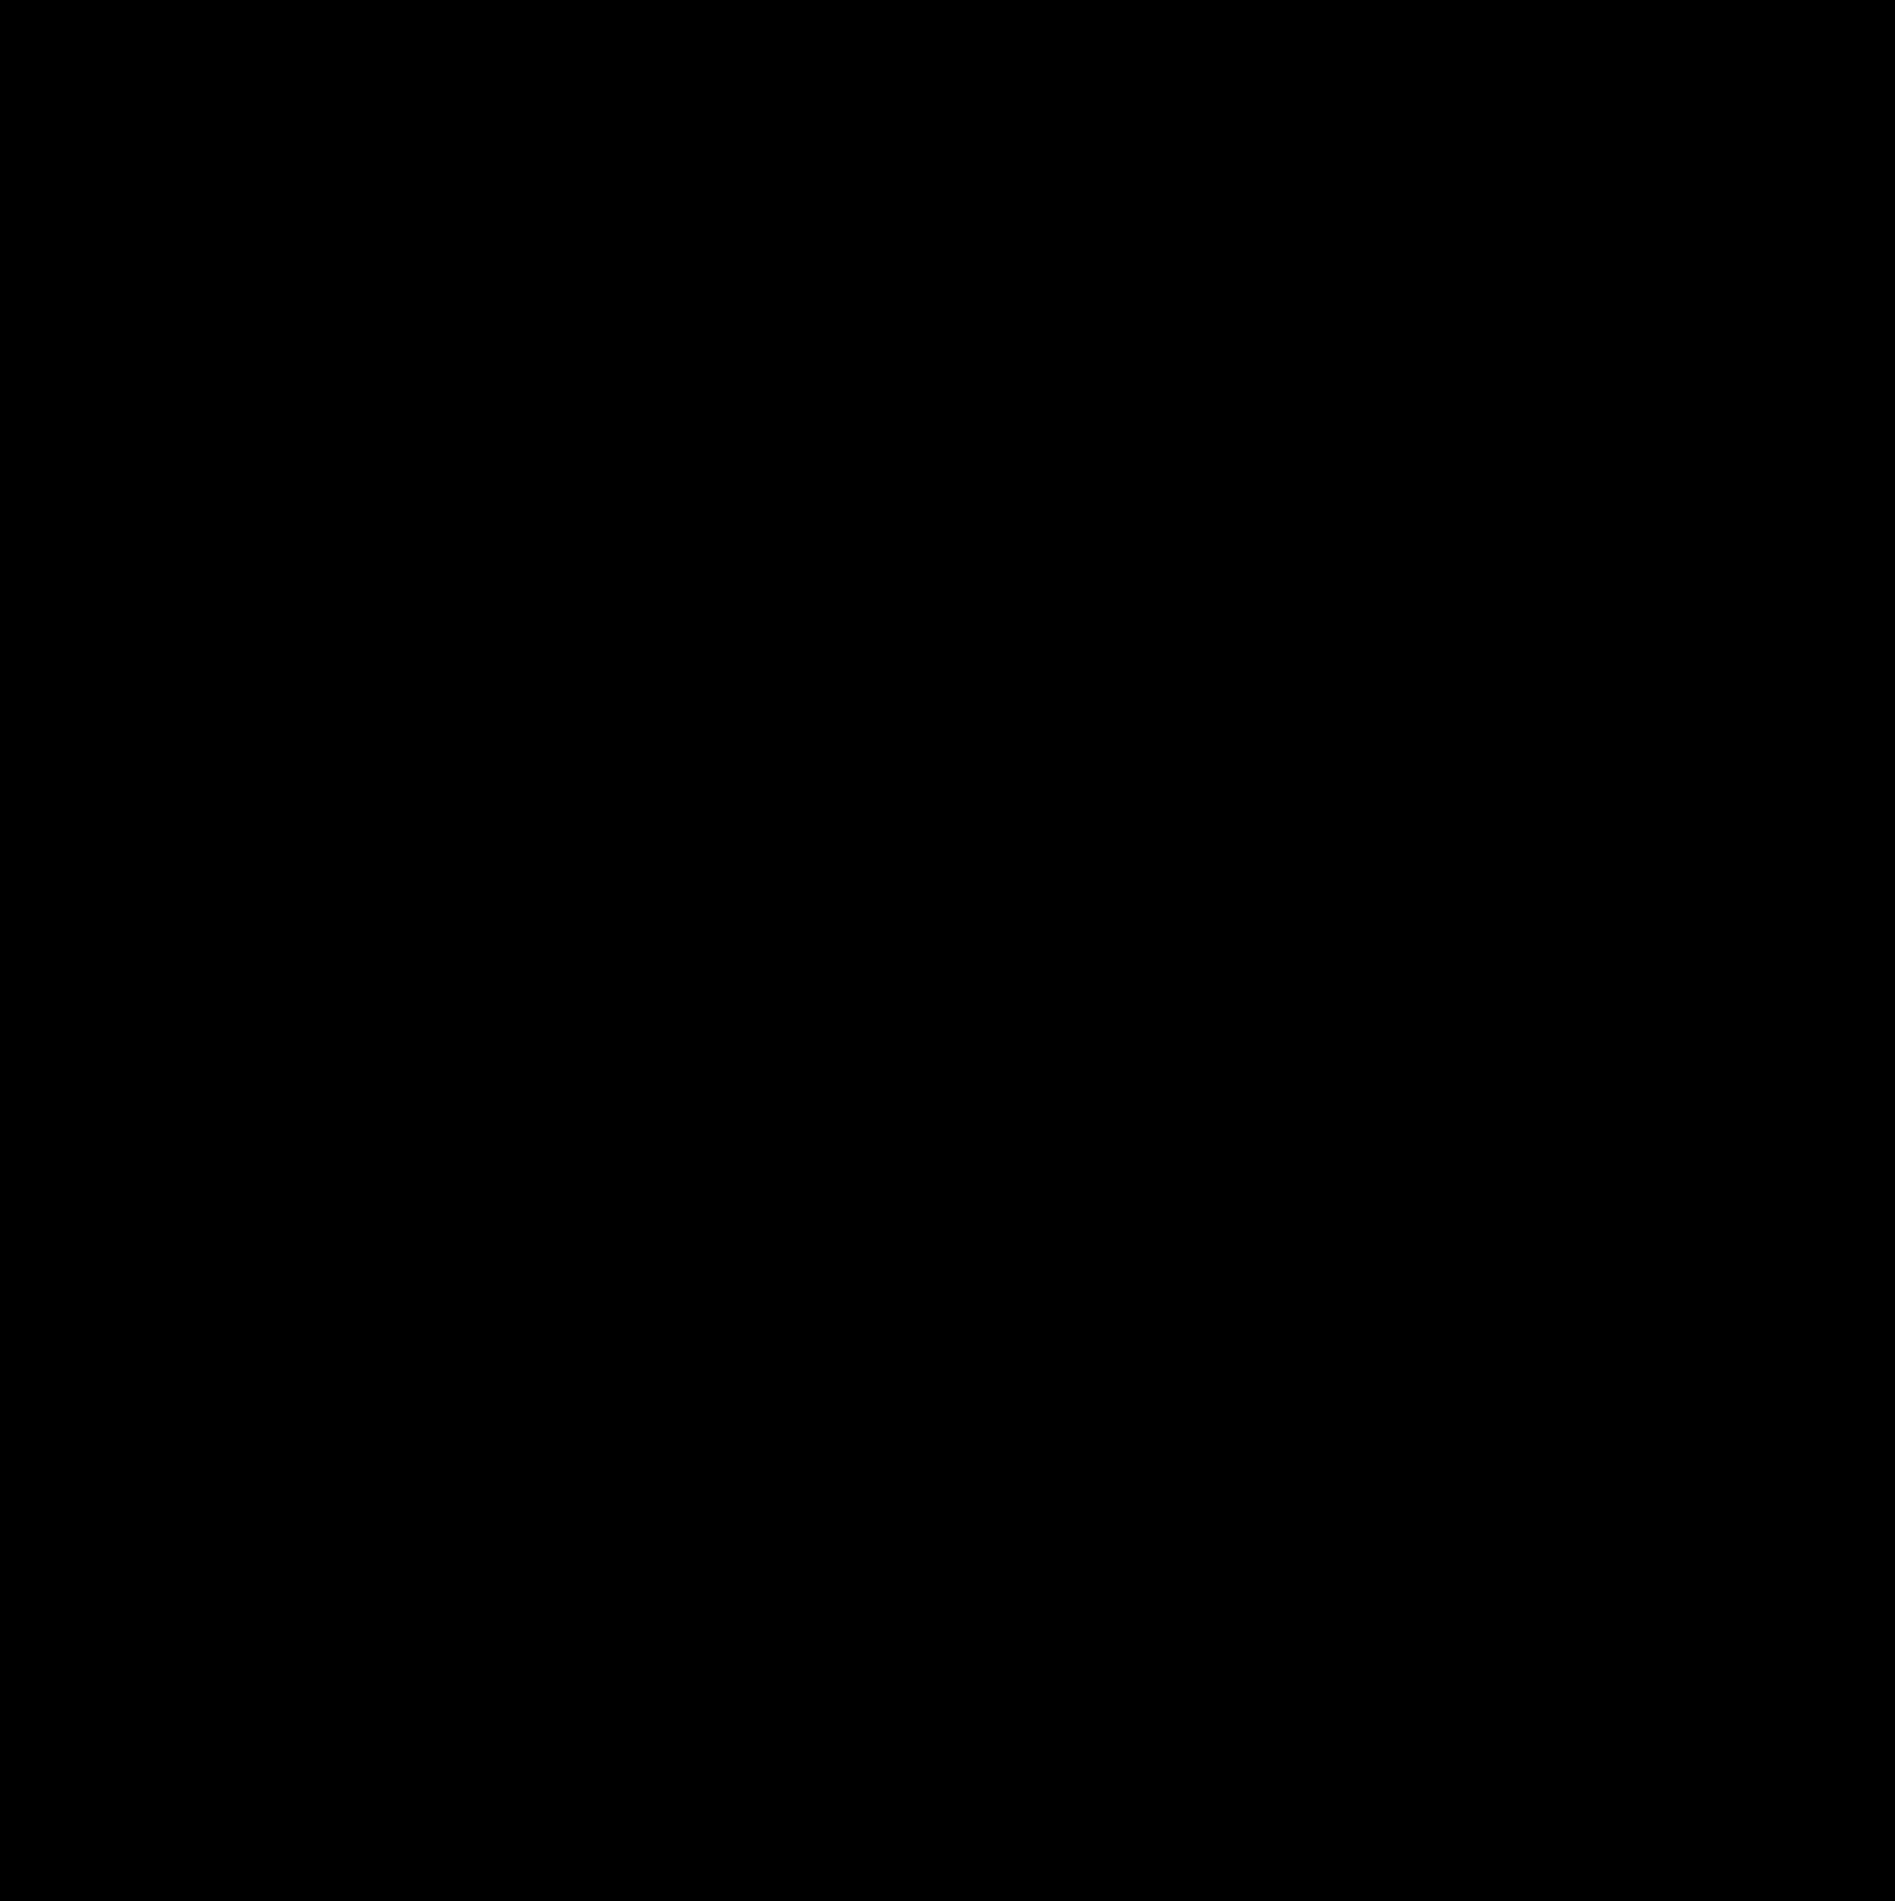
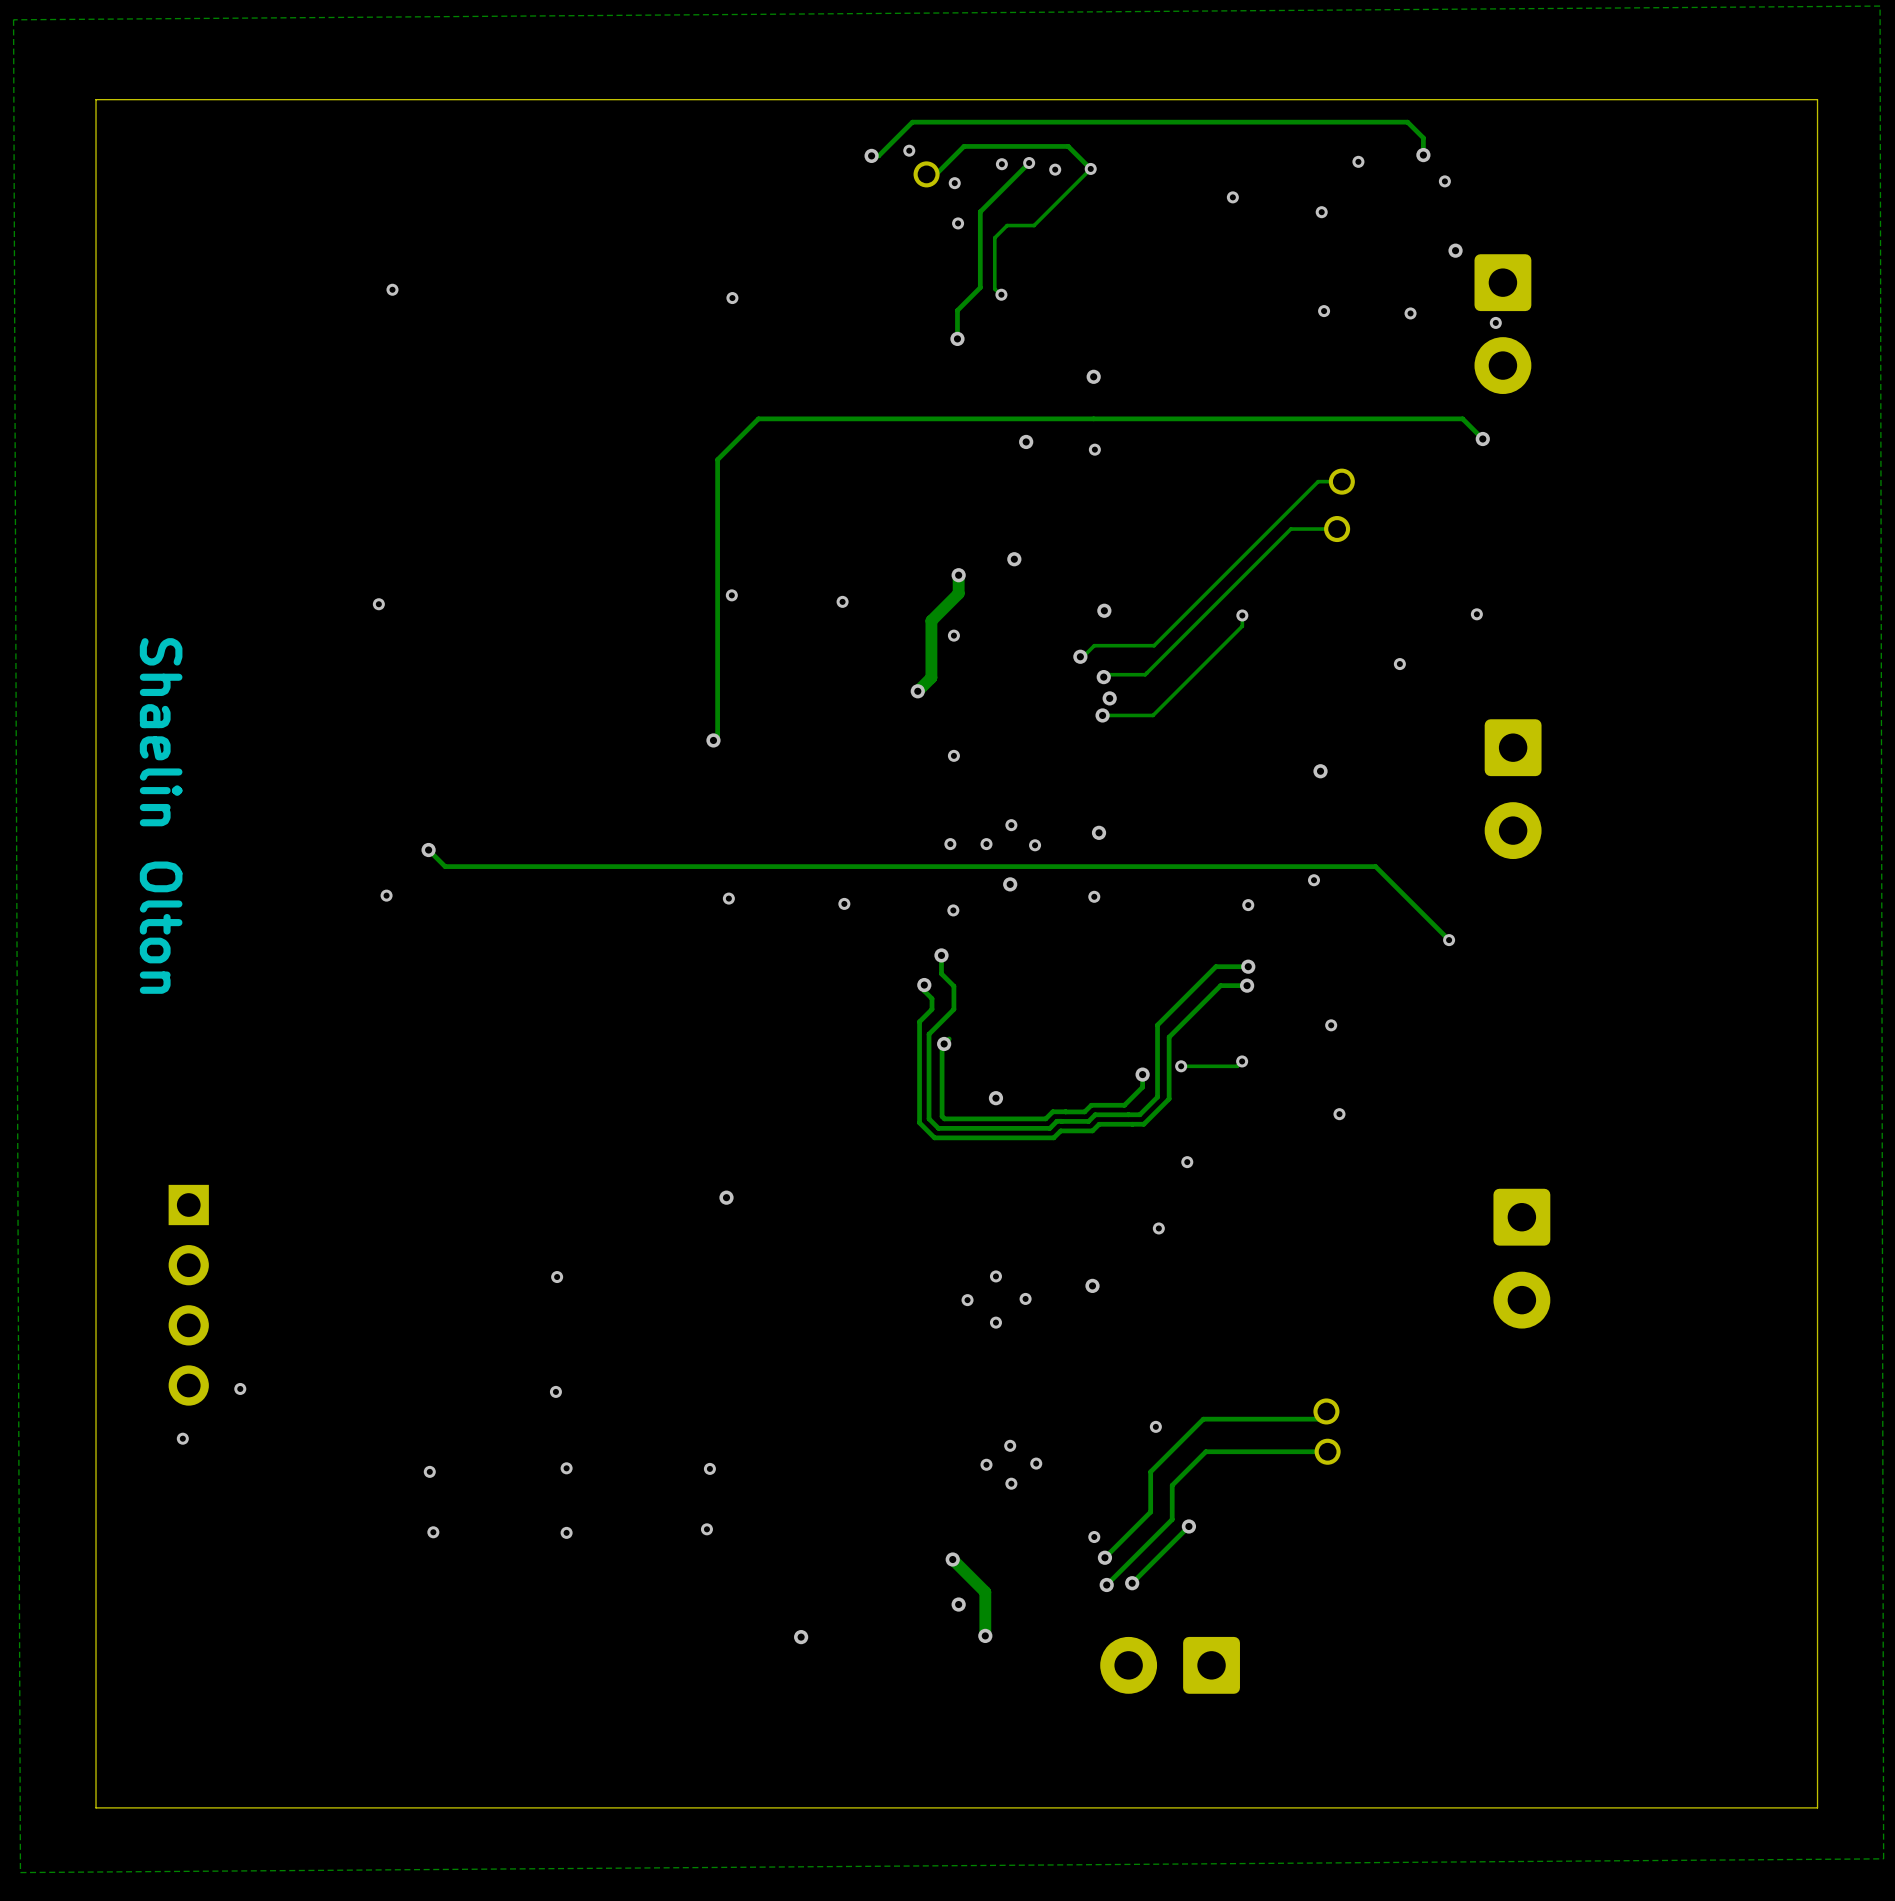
zone outline: none -> (1880, 6) (13, 19) (20, 1872) (1883, 1858) (1880, 6)
board edge: none -> (1817, 99) (96, 99) (96, 1807) (1817, 1807) (1817, 99)
via: none -> (909, 150)
via: none -> (871, 155)
track: none -> (1423, 155) (1423, 137) (1407, 122) (912, 122) (878, 155) (871, 155)
via: none -> (1423, 155)
via: none -> (1358, 161)
track: none -> (1029, 163) (980, 211) (980, 287) (957, 310) (957, 338)
via: none -> (1029, 163)
via: none -> (1001, 164)
via: none -> (1090, 168)
via: none -> (1055, 169)
track: none -> (926, 174) (935, 174) (963, 146) (1068, 146) (1090, 168) (1034, 225) (1007, 225) (994, 237) (994, 289) (1001, 294)
part: none -> (926, 174)
via: none -> (1444, 181)
via: none -> (954, 183)
via: none -> (1232, 197)
via: none -> (1321, 212)
via: none -> (958, 223)
via: none -> (1455, 250)
via: none -> (392, 289)
via: none -> (1001, 294)
via: none -> (732, 298)
via: none -> (1324, 311)
via: none -> (1410, 313)
via: none -> (1495, 322)
part: none -> (1502, 324)
via: none -> (957, 338)
via: none -> (1093, 376)
track: none -> (1482, 439) (1462, 418) (758, 418) (717, 459) (717, 736) (713, 740)
via: none -> (1482, 439)
via: none -> (1026, 441)
via: none -> (1094, 449)
track: none -> (1341, 481) (1318, 481) (1154, 645) (1094, 645) (1083, 656) (1080, 656)
part: none -> (1341, 481)
track: none -> (1337, 529) (1290, 529) (1145, 674) (1106, 674) (1103, 677)
part: none -> (1337, 529)
via: none -> (1014, 559)
track: none -> (958, 575) (958, 593) (931, 620) (931, 677) (917, 691)
via: none -> (958, 575)
via: none -> (731, 595)
via: none -> (842, 601)
via: none -> (378, 604)
via: none -> (1104, 610)
via: none -> (1476, 614)
track: none -> (1242, 615) (1242, 626) (1153, 715) (1102, 715)
via: none -> (1242, 615)
via: none -> (953, 635)
via: none -> (1080, 656)
via: none -> (1399, 664)
via: none -> (1103, 677)
via: none -> (917, 691)
via: none -> (1109, 698)
via: none -> (1102, 715)
via: none -> (713, 740)
via: none -> (953, 755)
via: none -> (1320, 771)
part: none -> (1513, 789)
text: none -> Shaelin Olton (161, 815)
via: none -> (1011, 825)
via: none -> (1099, 832)
via: none -> (950, 844)
via: none -> (986, 844)
via: none -> (1035, 845)
track: none -> (428, 850) (445, 866) (1375, 866) (1449, 940)
via: none -> (428, 850)
via: none -> (1314, 880)
via: none -> (1010, 884)
via: none -> (386, 895)
via: none -> (1094, 896)
via: none -> (728, 898)
via: none -> (844, 903)
via: none -> (1248, 905)
via: none -> (953, 910)
via: none -> (1449, 940)
track: none -> (941, 955) (941, 973) (953, 986) (953, 1009) (929, 1034) (929, 1118) (938, 1128) (1049, 1128) (1056, 1121) (1088, 1121) (1095, 1114) (1139, 1114) (1157, 1097) (1157, 1025) (1215, 966) (1248, 966)
via: none -> (941, 955)
via: none -> (1248, 966)
track: none -> (924, 985) (924, 990) (932, 998) (932, 1009) (919, 1021) (919, 1122) (934, 1137) (1053, 1137) (1060, 1130) (1092, 1130) (1099, 1124) (1143, 1124) (1169, 1098) (1169, 1037) (1220, 985) (1247, 985)
via: none -> (924, 985)
via: none -> (1247, 985)
via: none -> (1331, 1025)
track: none -> (949, 1038) (942, 1046) (942, 1116) (944, 1118) (1045, 1118) (1052, 1111) (1065, 1111)
via: none -> (944, 1043)
track: none -> (1242, 1061) (1237, 1066) (1181, 1066)
via: none -> (1242, 1061)
via: none -> (1181, 1066)
track: none -> (1142, 1074) (1142, 1087) (1124, 1105) (1091, 1105) (1084, 1111) (1065, 1111)
via: none -> (1142, 1074)
via: none -> (995, 1098)
via: none -> (1339, 1114)
via: none -> (1187, 1162)
via: none -> (726, 1197)
via: none -> (1158, 1228)
part: none -> (1521, 1258)
via: none -> (995, 1276)
via: none -> (557, 1277)
via: none -> (1092, 1285)
part: none -> (188, 1295)
via: none -> (1025, 1298)
via: none -> (967, 1300)
via: none -> (995, 1322)
via: none -> (240, 1388)
via: none -> (555, 1391)
track: none -> (1326, 1411) (1318, 1419) (1203, 1419) (1150, 1471) (1150, 1512) (1104, 1557)
part: none -> (1326, 1411)
via: none -> (1155, 1426)
via: none -> (182, 1438)
via: none -> (1010, 1445)
track: none -> (1327, 1451) (1205, 1451) (1172, 1485) (1172, 1519) (1106, 1584)
part: none -> (1327, 1451)
via: none -> (1036, 1463)
via: none -> (986, 1464)
via: none -> (566, 1468)
via: none -> (709, 1468)
via: none -> (429, 1471)
via: none -> (1011, 1483)
track: none -> (1188, 1526) (1132, 1583)
via: none -> (1188, 1526)
via: none -> (706, 1529)
via: none -> (433, 1532)
via: none -> (566, 1532)
via: none -> (1094, 1537)
via: none -> (1104, 1557)
track: none -> (952, 1559) (985, 1592) (985, 1635)
via: none -> (952, 1559)
via: none -> (1132, 1583)
via: none -> (1106, 1584)
via: none -> (958, 1604)
via: none -> (985, 1635)
via: none -> (801, 1637)
part: none -> (1170, 1665)

